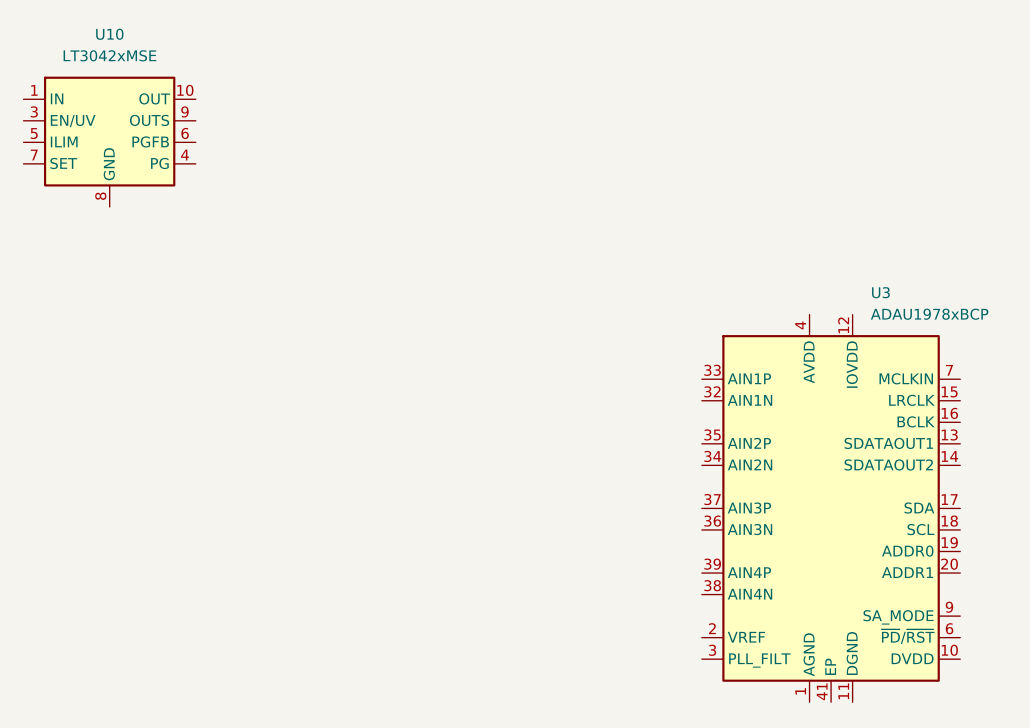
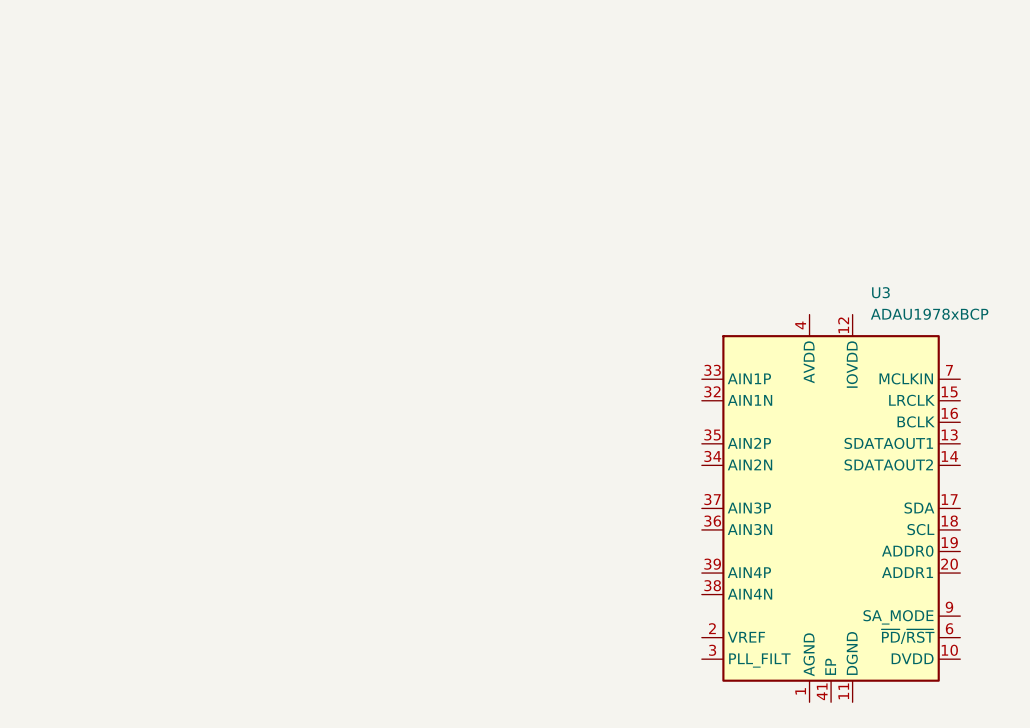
U10: LT3042xMSE (109, 141) -> none

